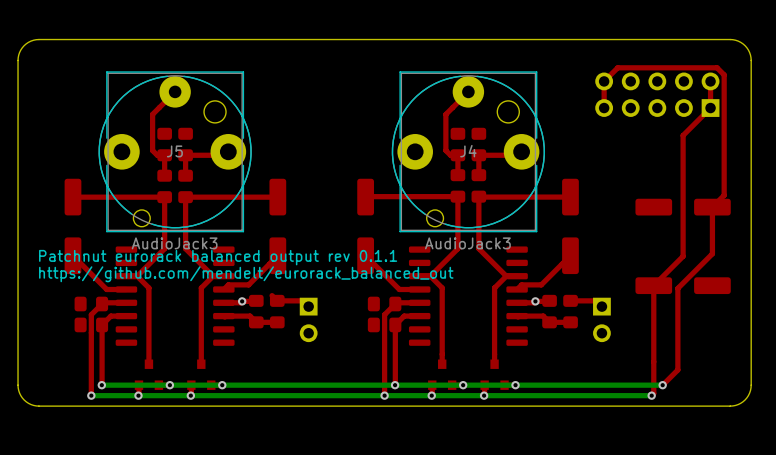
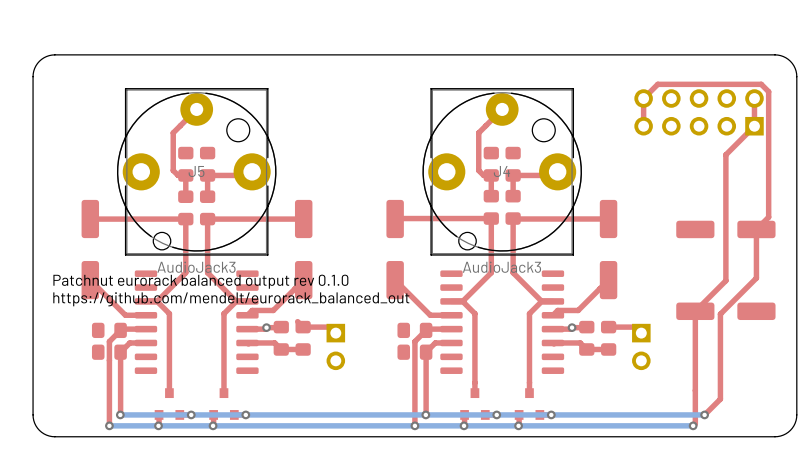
text: Patchnut eurorack balanced output rev 0.1.1 (218, 257) -> Patchnut eurorack balanced output rev 0.1.0 (200, 281)

